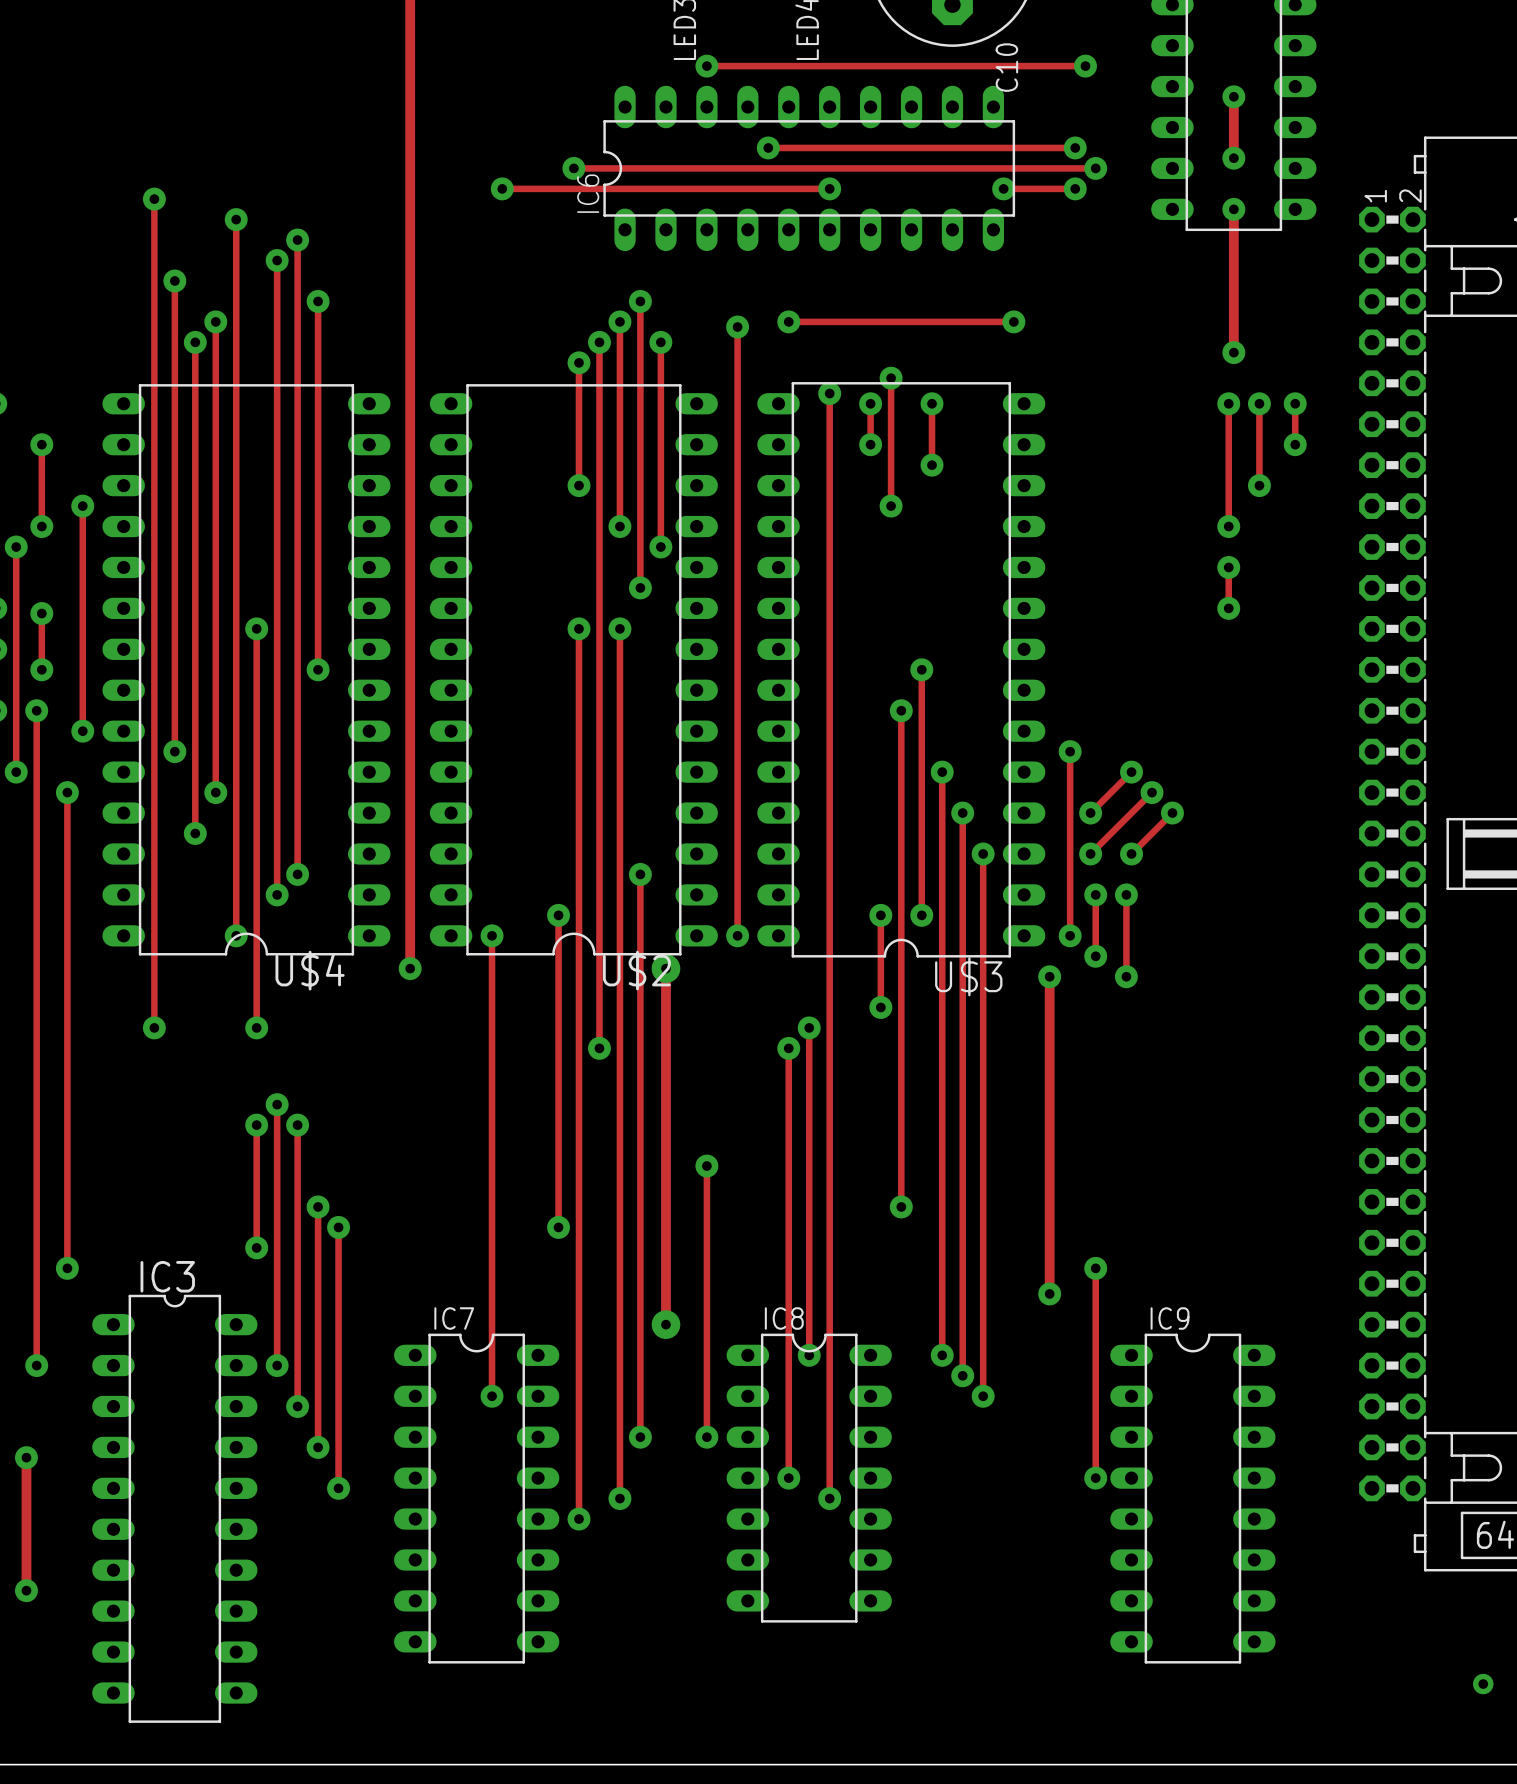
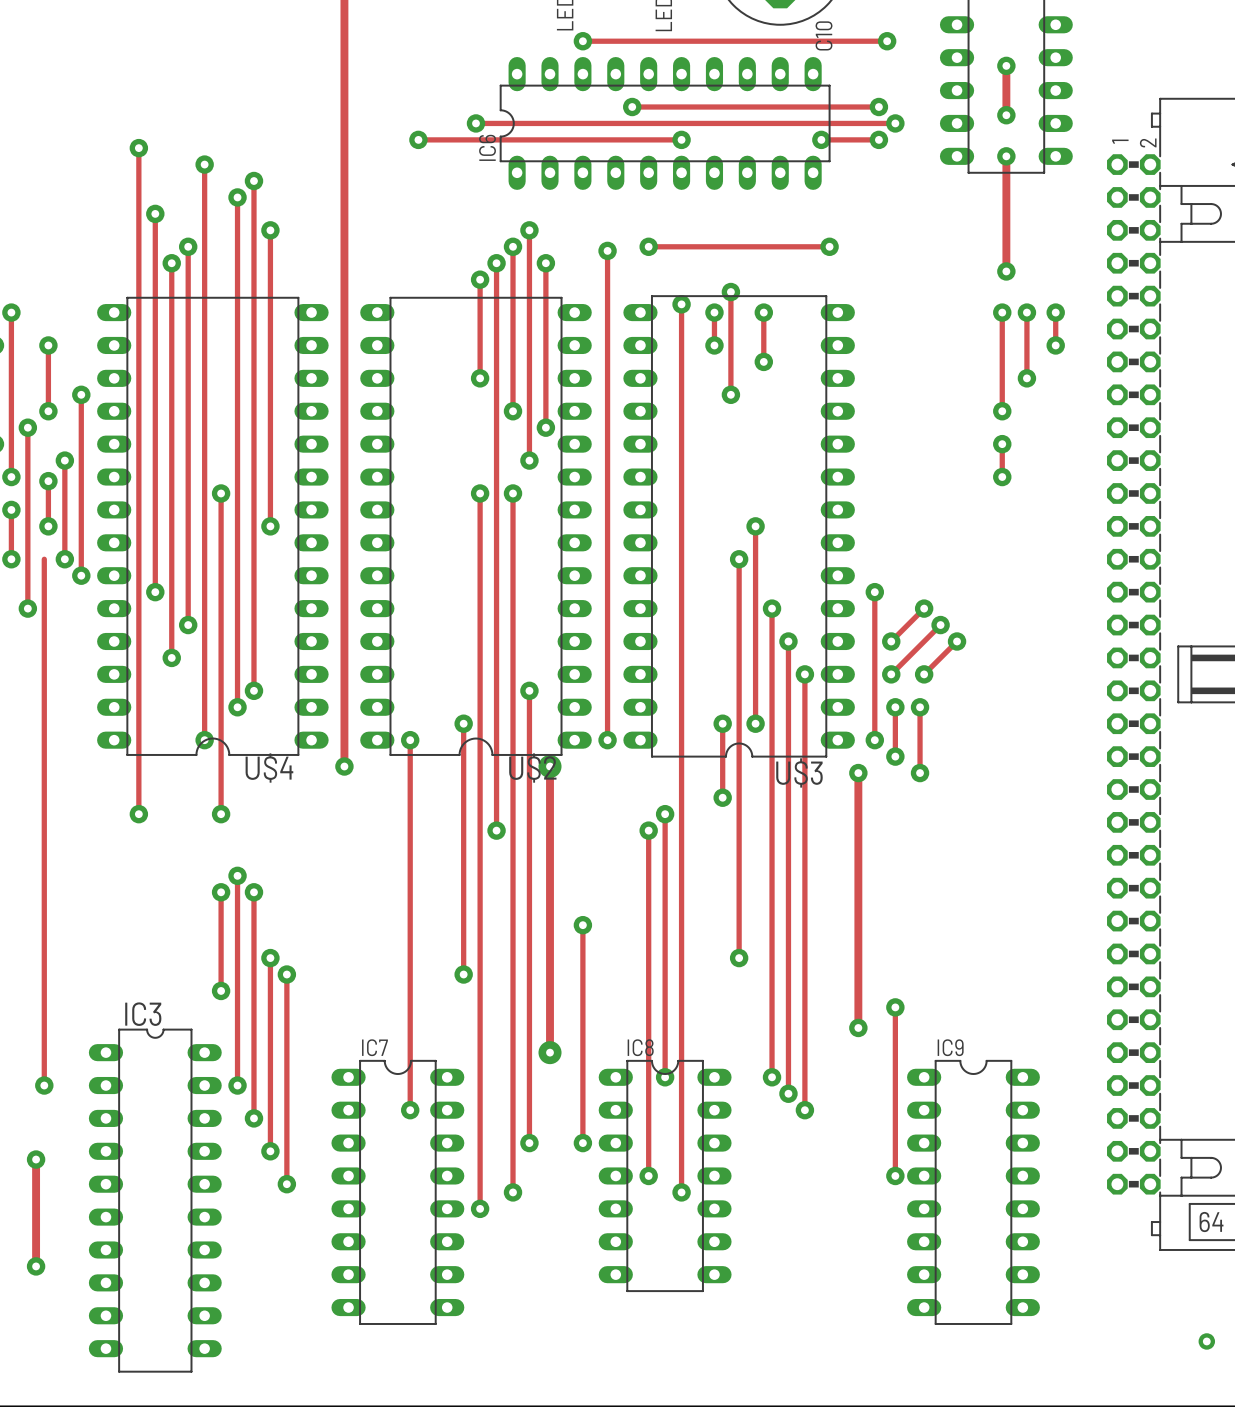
track: none -> (64, 460) (64, 559)
via: none -> (64, 460)
via position: (36, 710) -> (64, 559)
track: (67, 792) (67, 1268) -> none
via: (67, 792) -> none
via: (67, 1268) -> none

